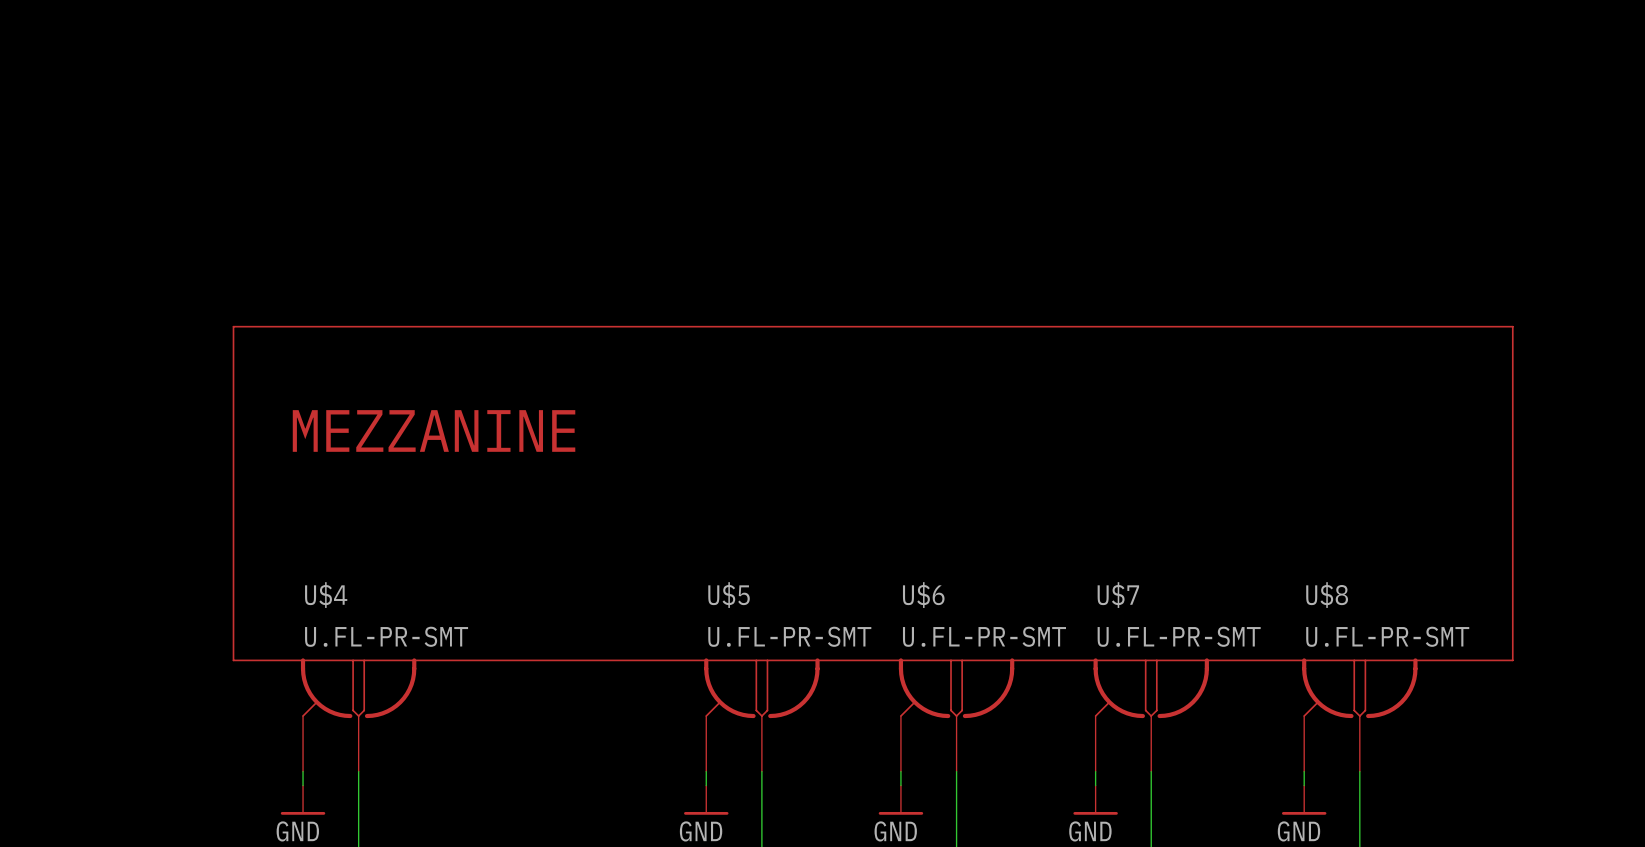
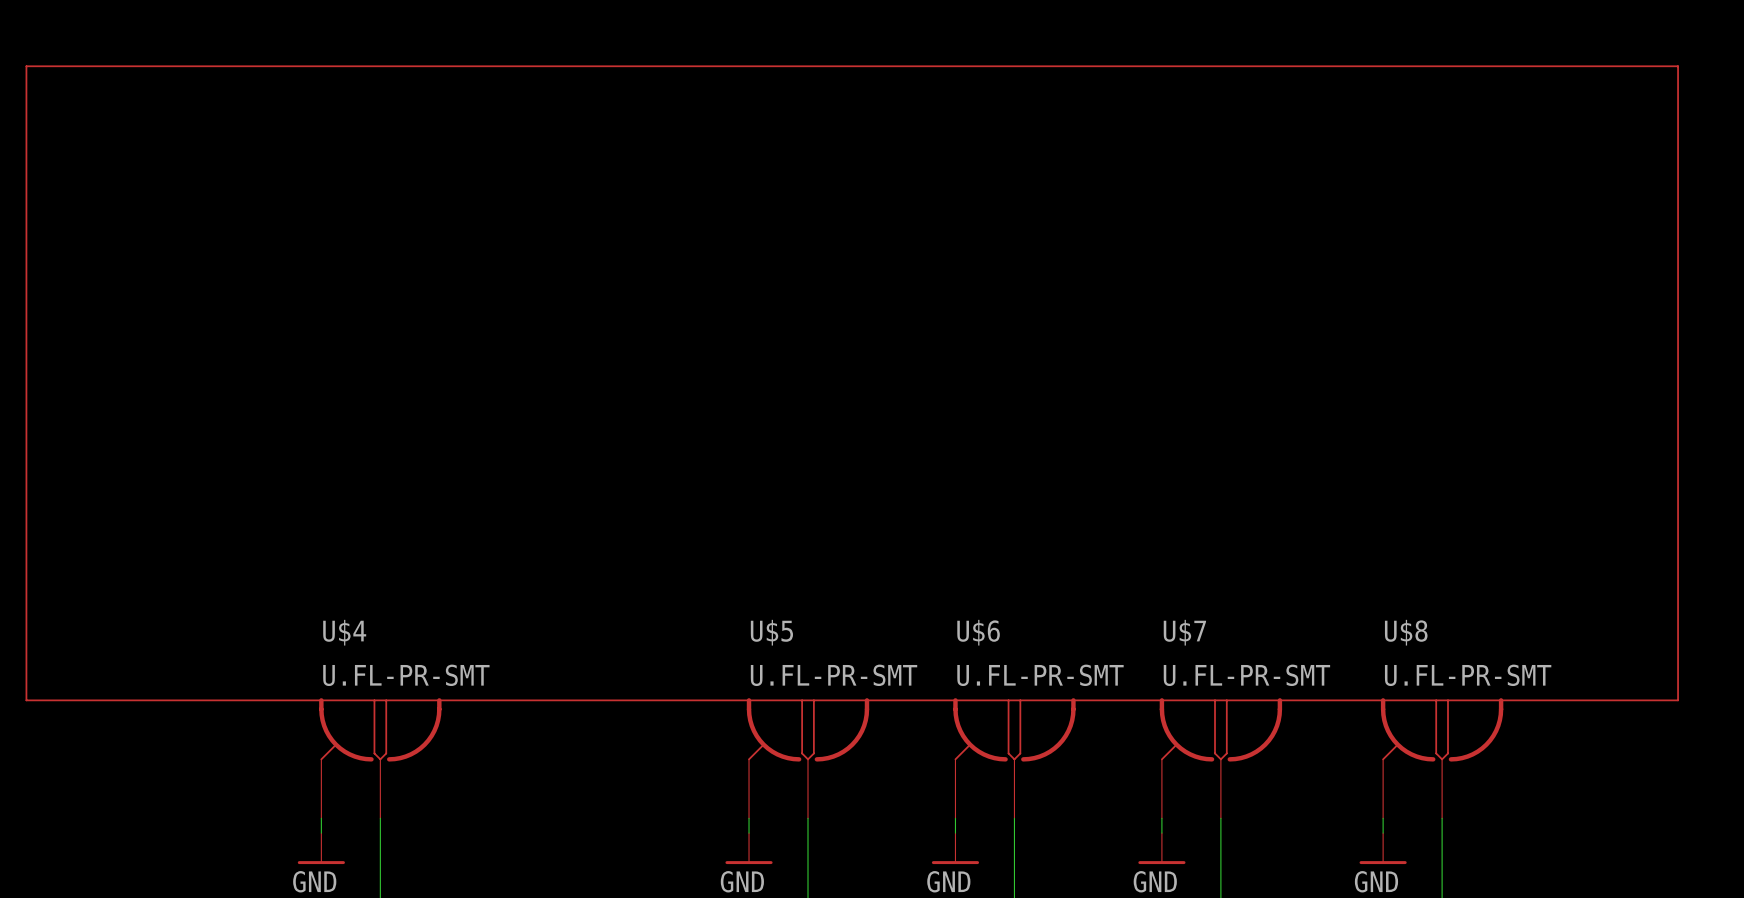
text: MEZZANINE (434, 430) -> none
line: (233, 660) (233, 326) (1512, 326) (1512, 660) -> (247, 700) (26, 700) (26, 66) (1678, 66) (1678, 700) (1604, 700)

